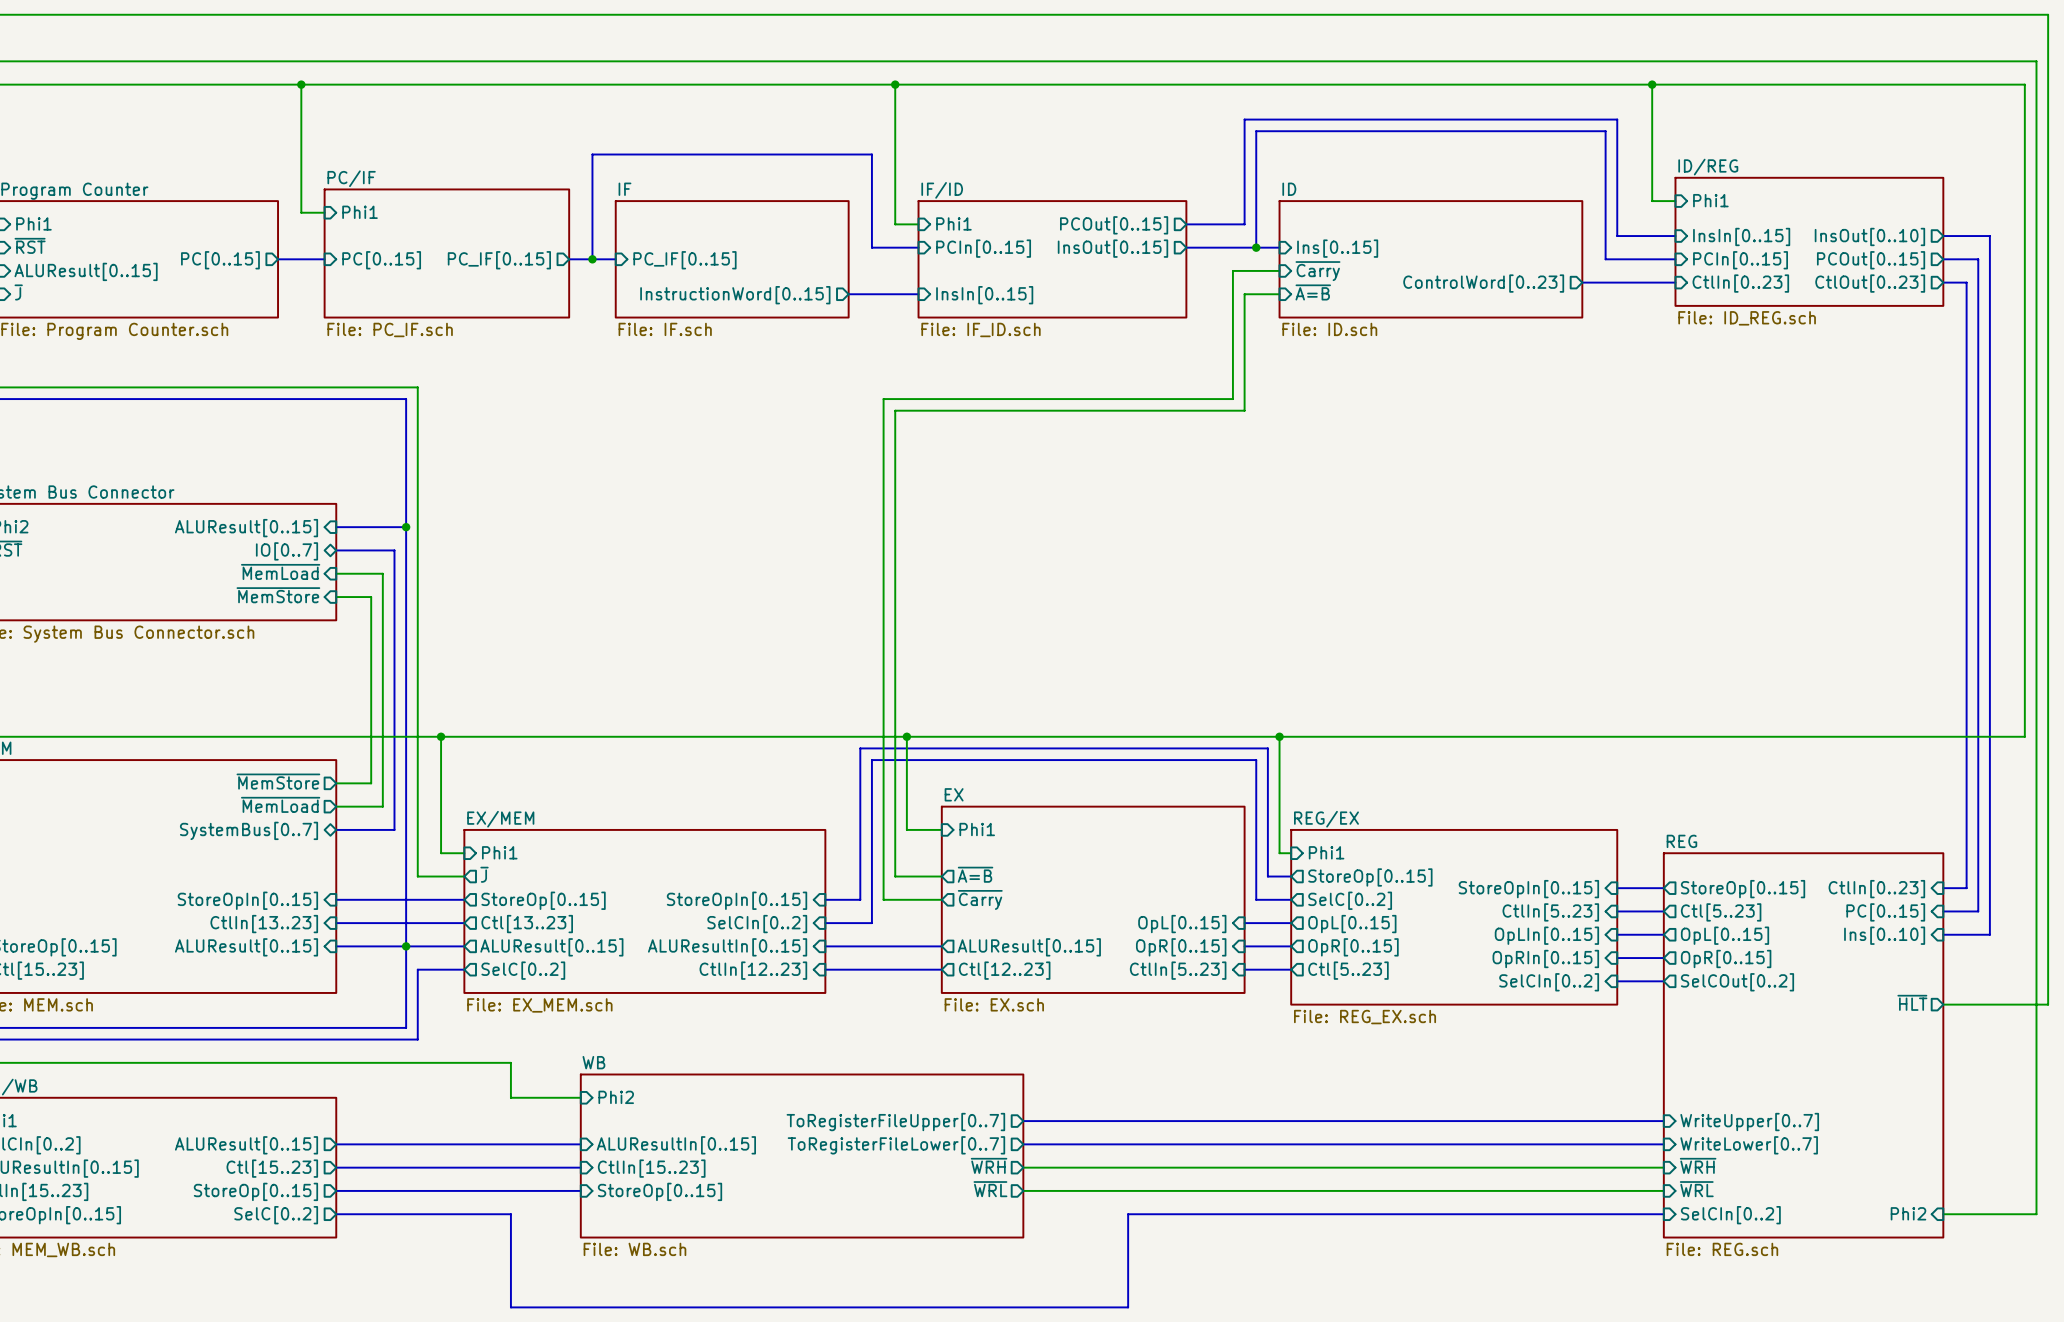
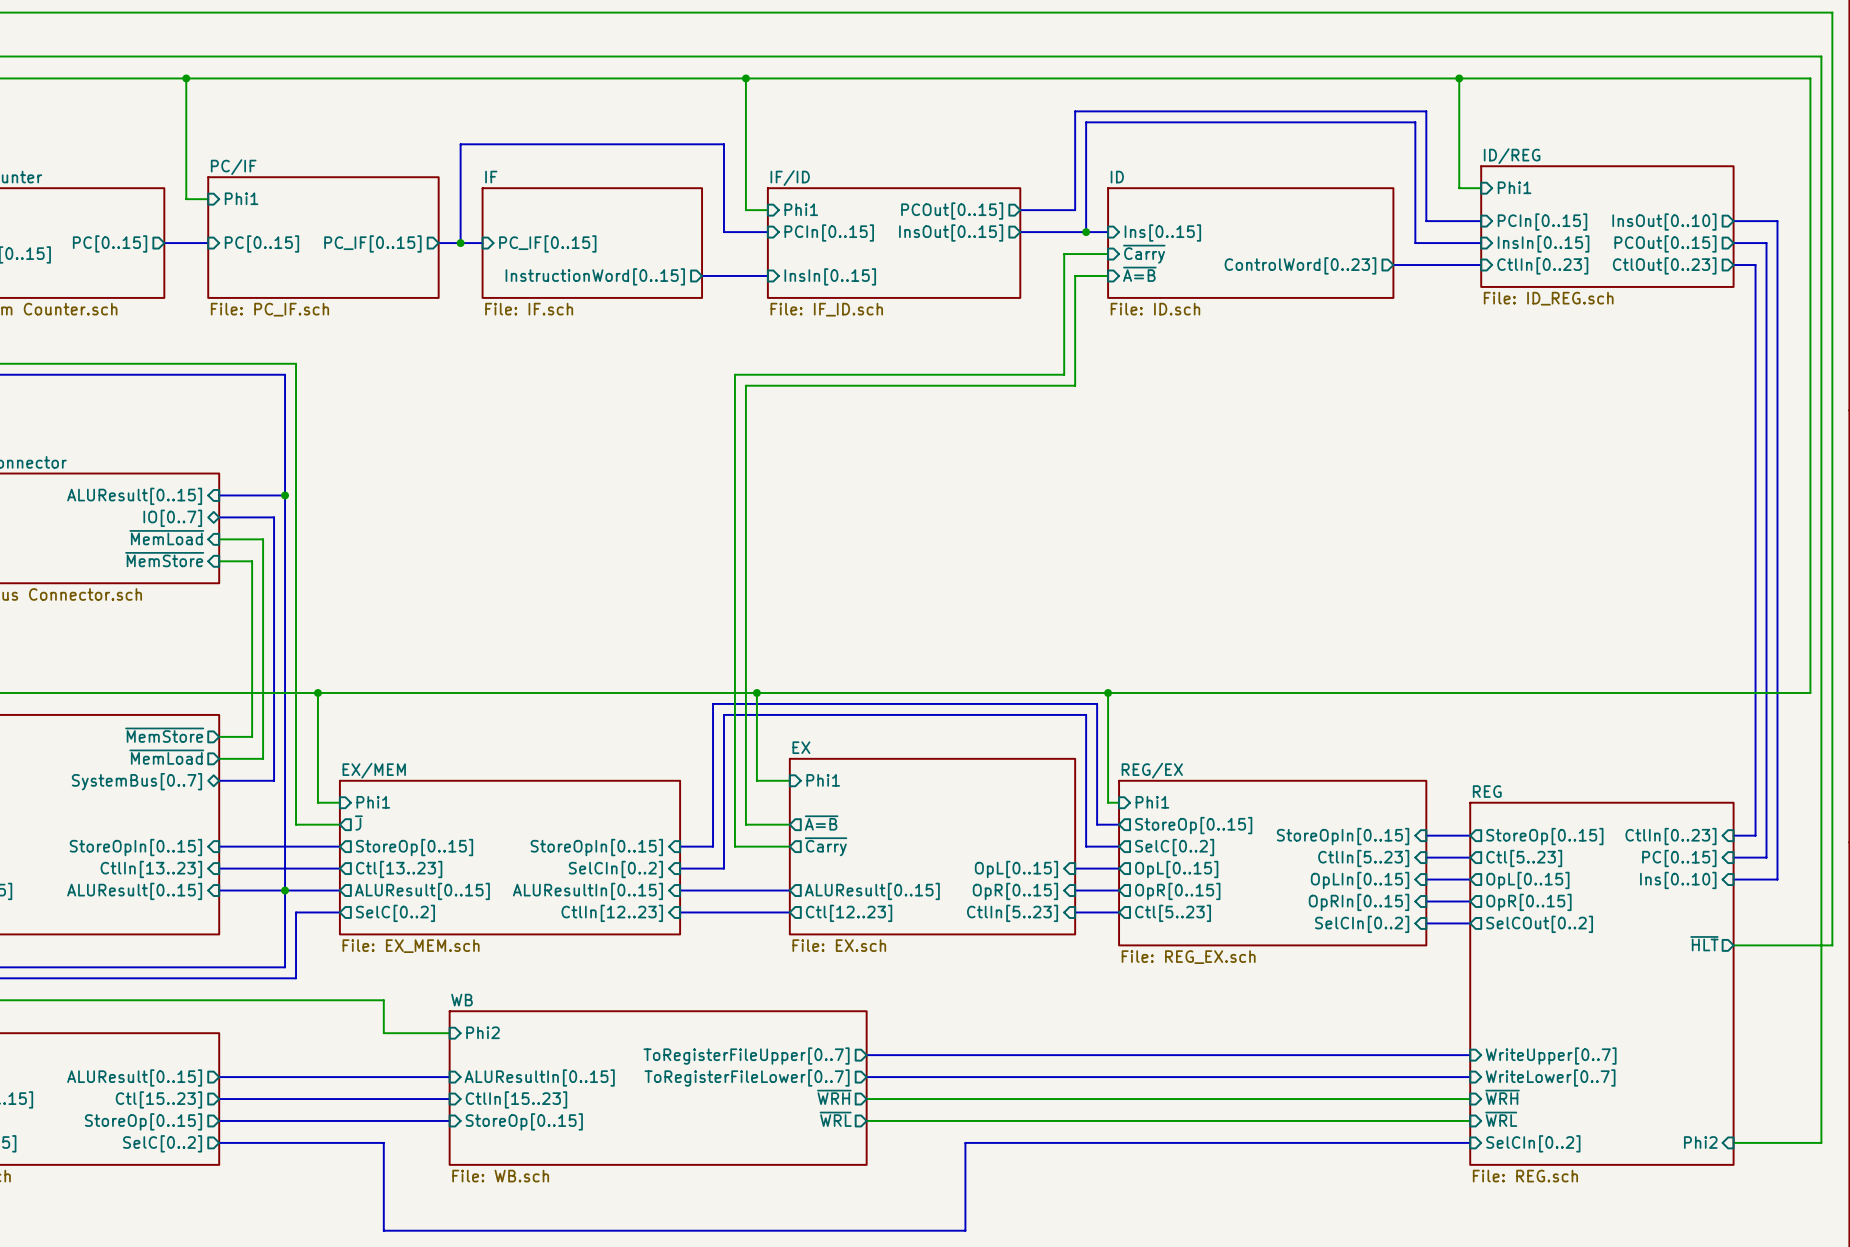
sheet pin: InsIn[0..15] (1741, 236) -> PCIn[0..15] (1542, 222)
sheet pin: PCIn[0..15] (1740, 260) -> InsIn[0..15] (1543, 243)

